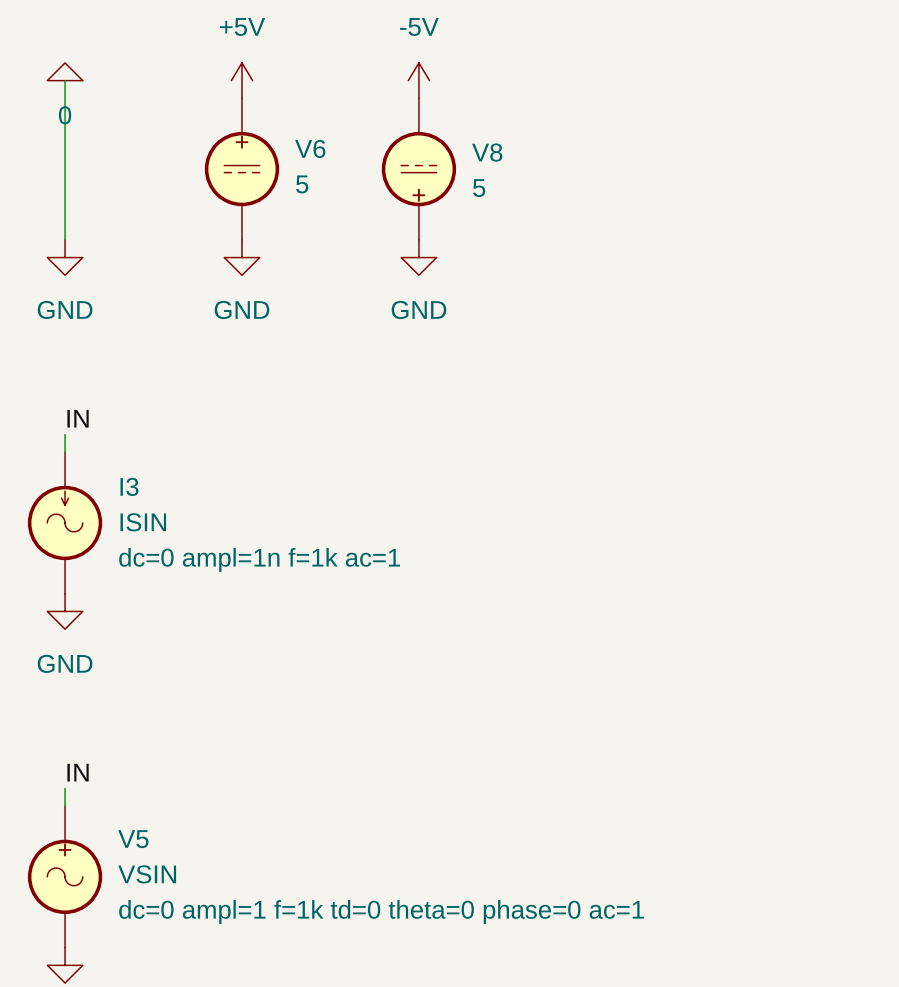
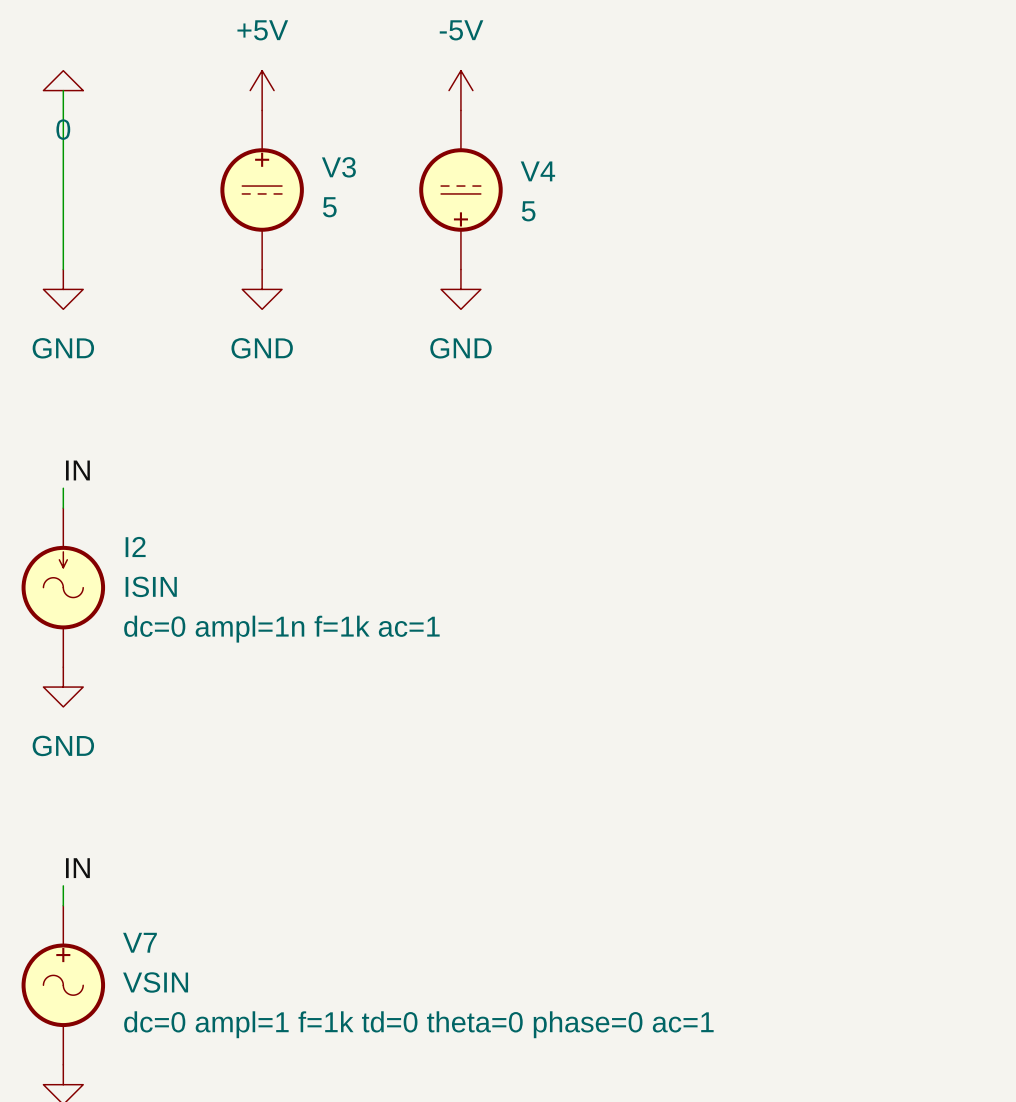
V6 name: V6 (310, 148) -> V3 (338, 167)
V8 name: V8 (487, 152) -> V4 (537, 171)
I3 name: I3 (129, 486) -> I2 (135, 546)
V5 name: V5 (133, 839) -> V7 (139, 942)

